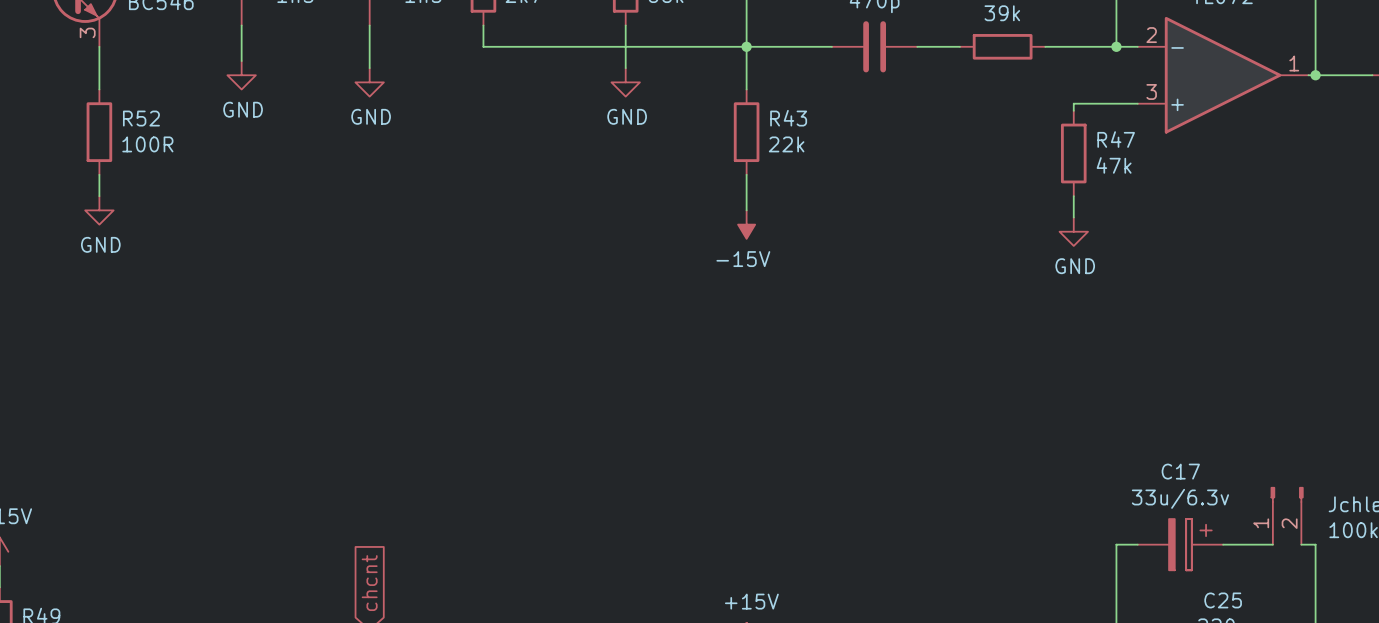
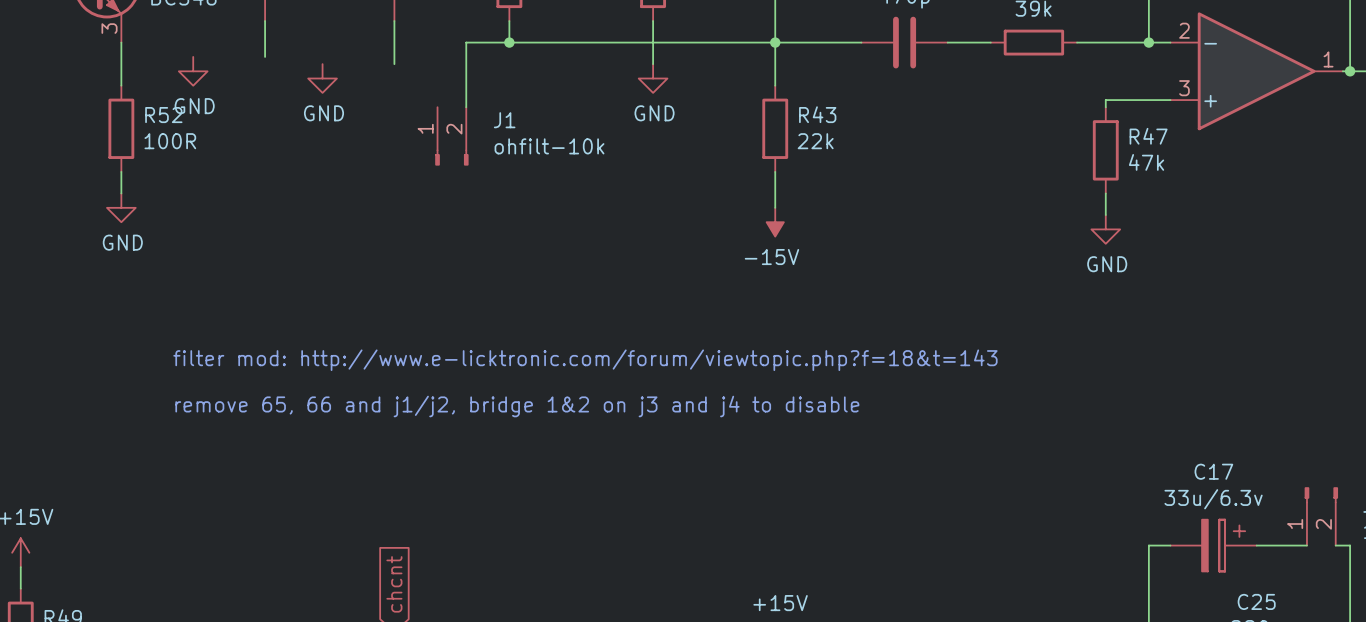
wire: none -> (509, 42) (466, 42) (466, 107)
junction: none -> (509, 42)
power symbol: none -> GND (193, 71)
power symbol: GND (241, 75) -> none
power symbol: none -> GND (322, 78)
power symbol: GND (369, 82) -> none
J1: none -> ohfilt-10k (451, 136)
text: none -> filter mod: http://www.e-licktronic.com/forum/viewtopic.php?f=18&t=143 (585, 360)
text: none -> remove 65, 66 and j1/j2, bridge 1&2 on j3 and j4 to disable (517, 406)

